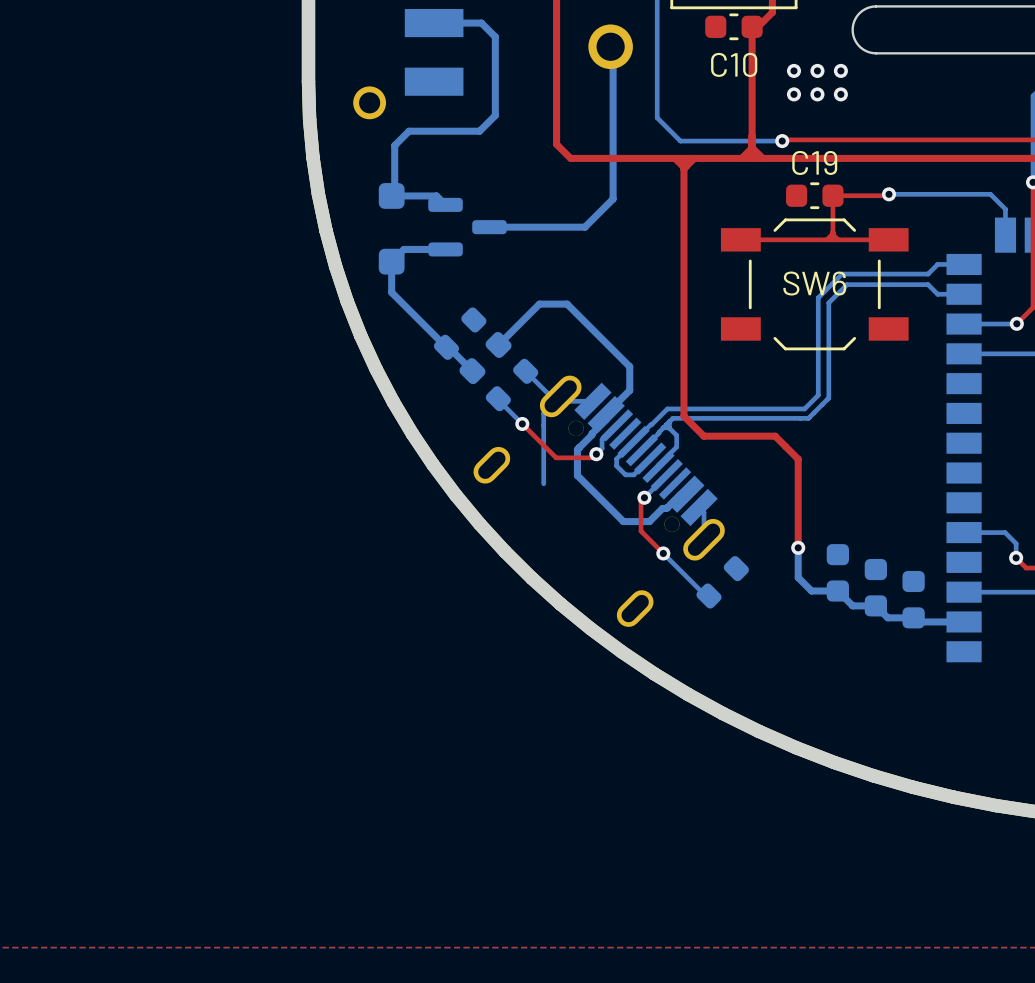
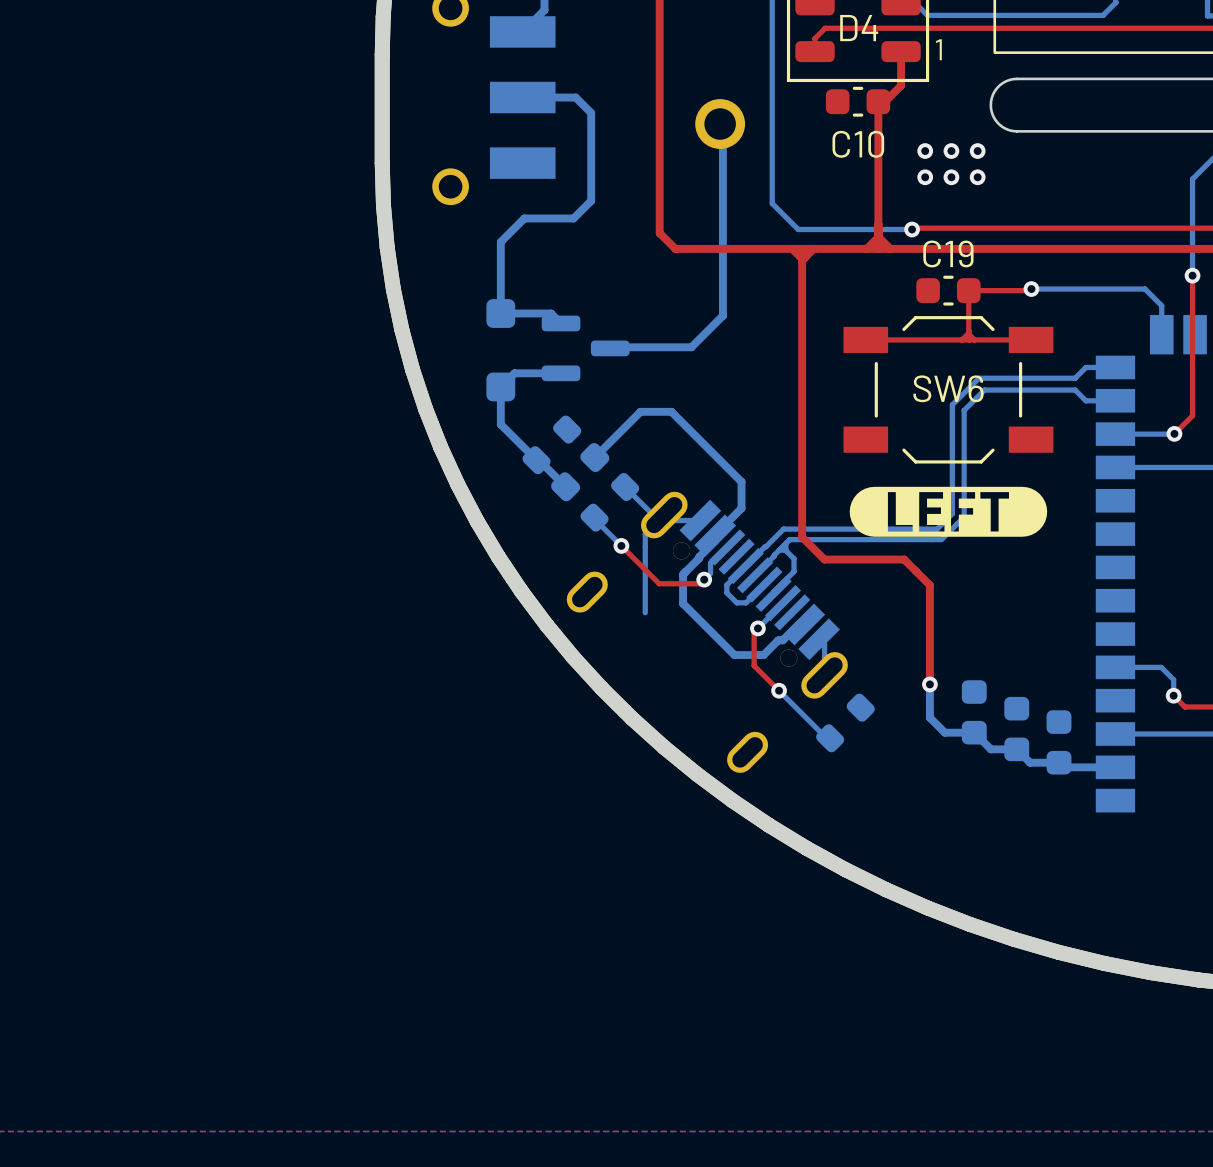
bottom track: (435, 131) (409, 131) (394, 145) (394, 192) (391, 195) (436, 195) (445, 204) -> (524, 218) (500, 241) (500, 313) (551, 313) (561, 323)
bottom track: (613, 199) (584, 227) (489, 227) -> (722, 294) (722, 315) (691, 347) (610, 348)
part position: (467, 227) -> (585, 348)
part position: (391, 228) -> (500, 350)
bottom track: (445, 249) (403, 249) (391, 261) (391, 292) (414, 315) -> (561, 373) (514, 373) (500, 386) (500, 424)
drawing: none -> [849, 486, 1048, 537]

